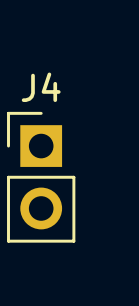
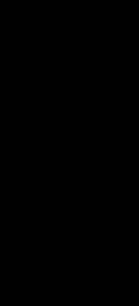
J4: (41, 177) -> none

